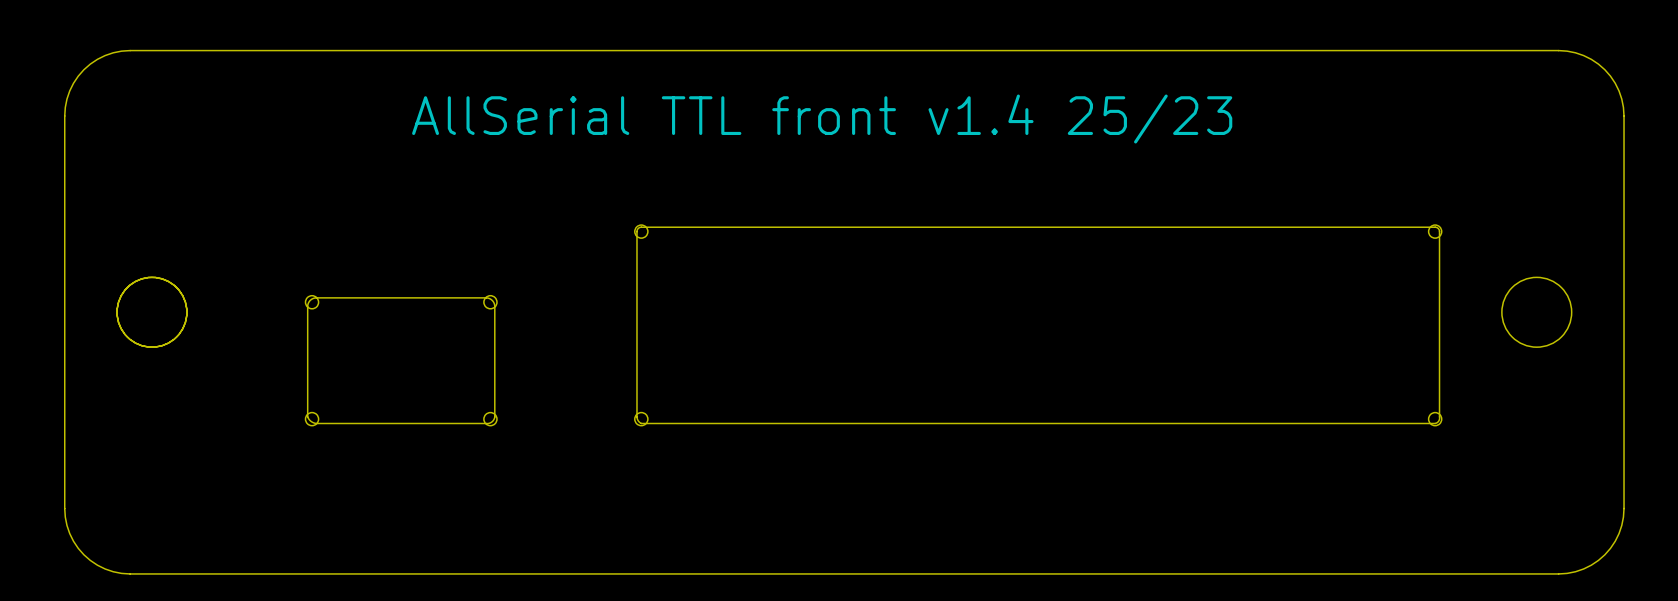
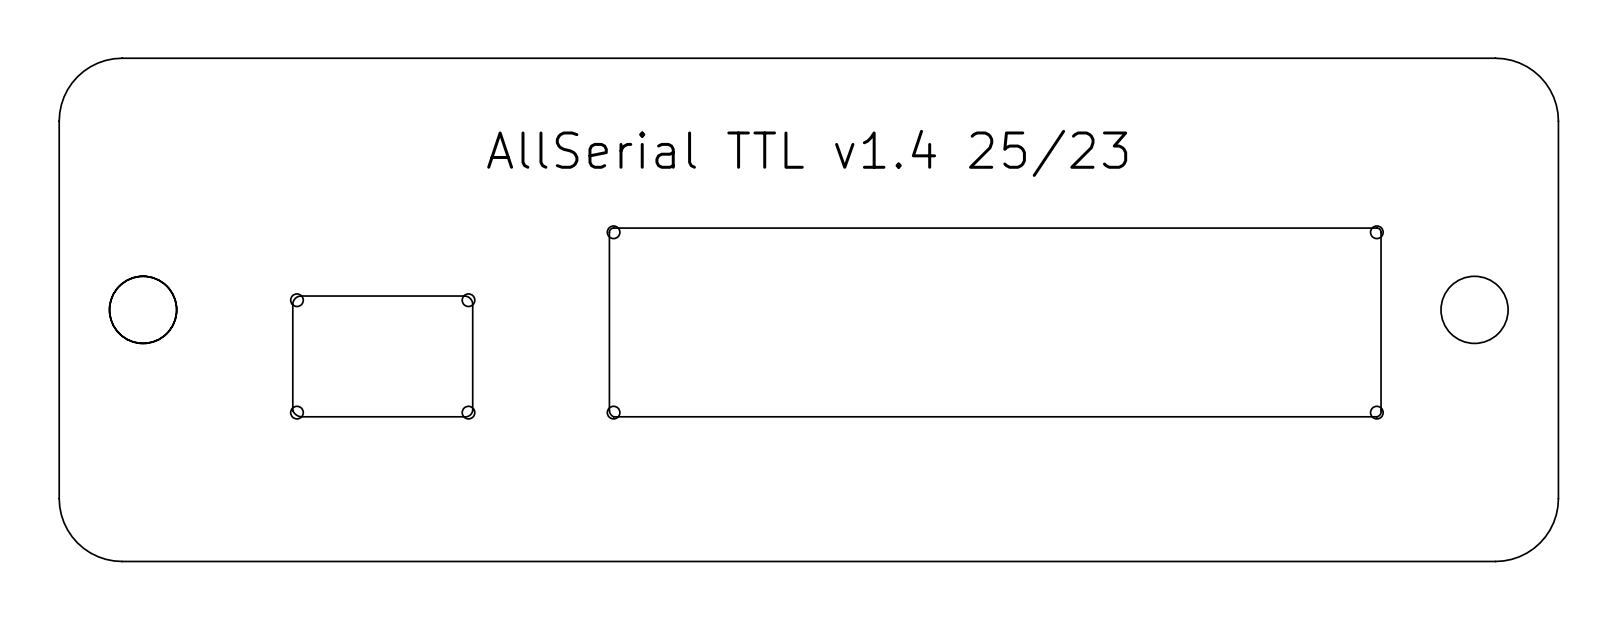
text: AllSerial TTL front v1.4 25/23 (822, 119) -> AllSerial TTL v1.4 25/23 (807, 153)

